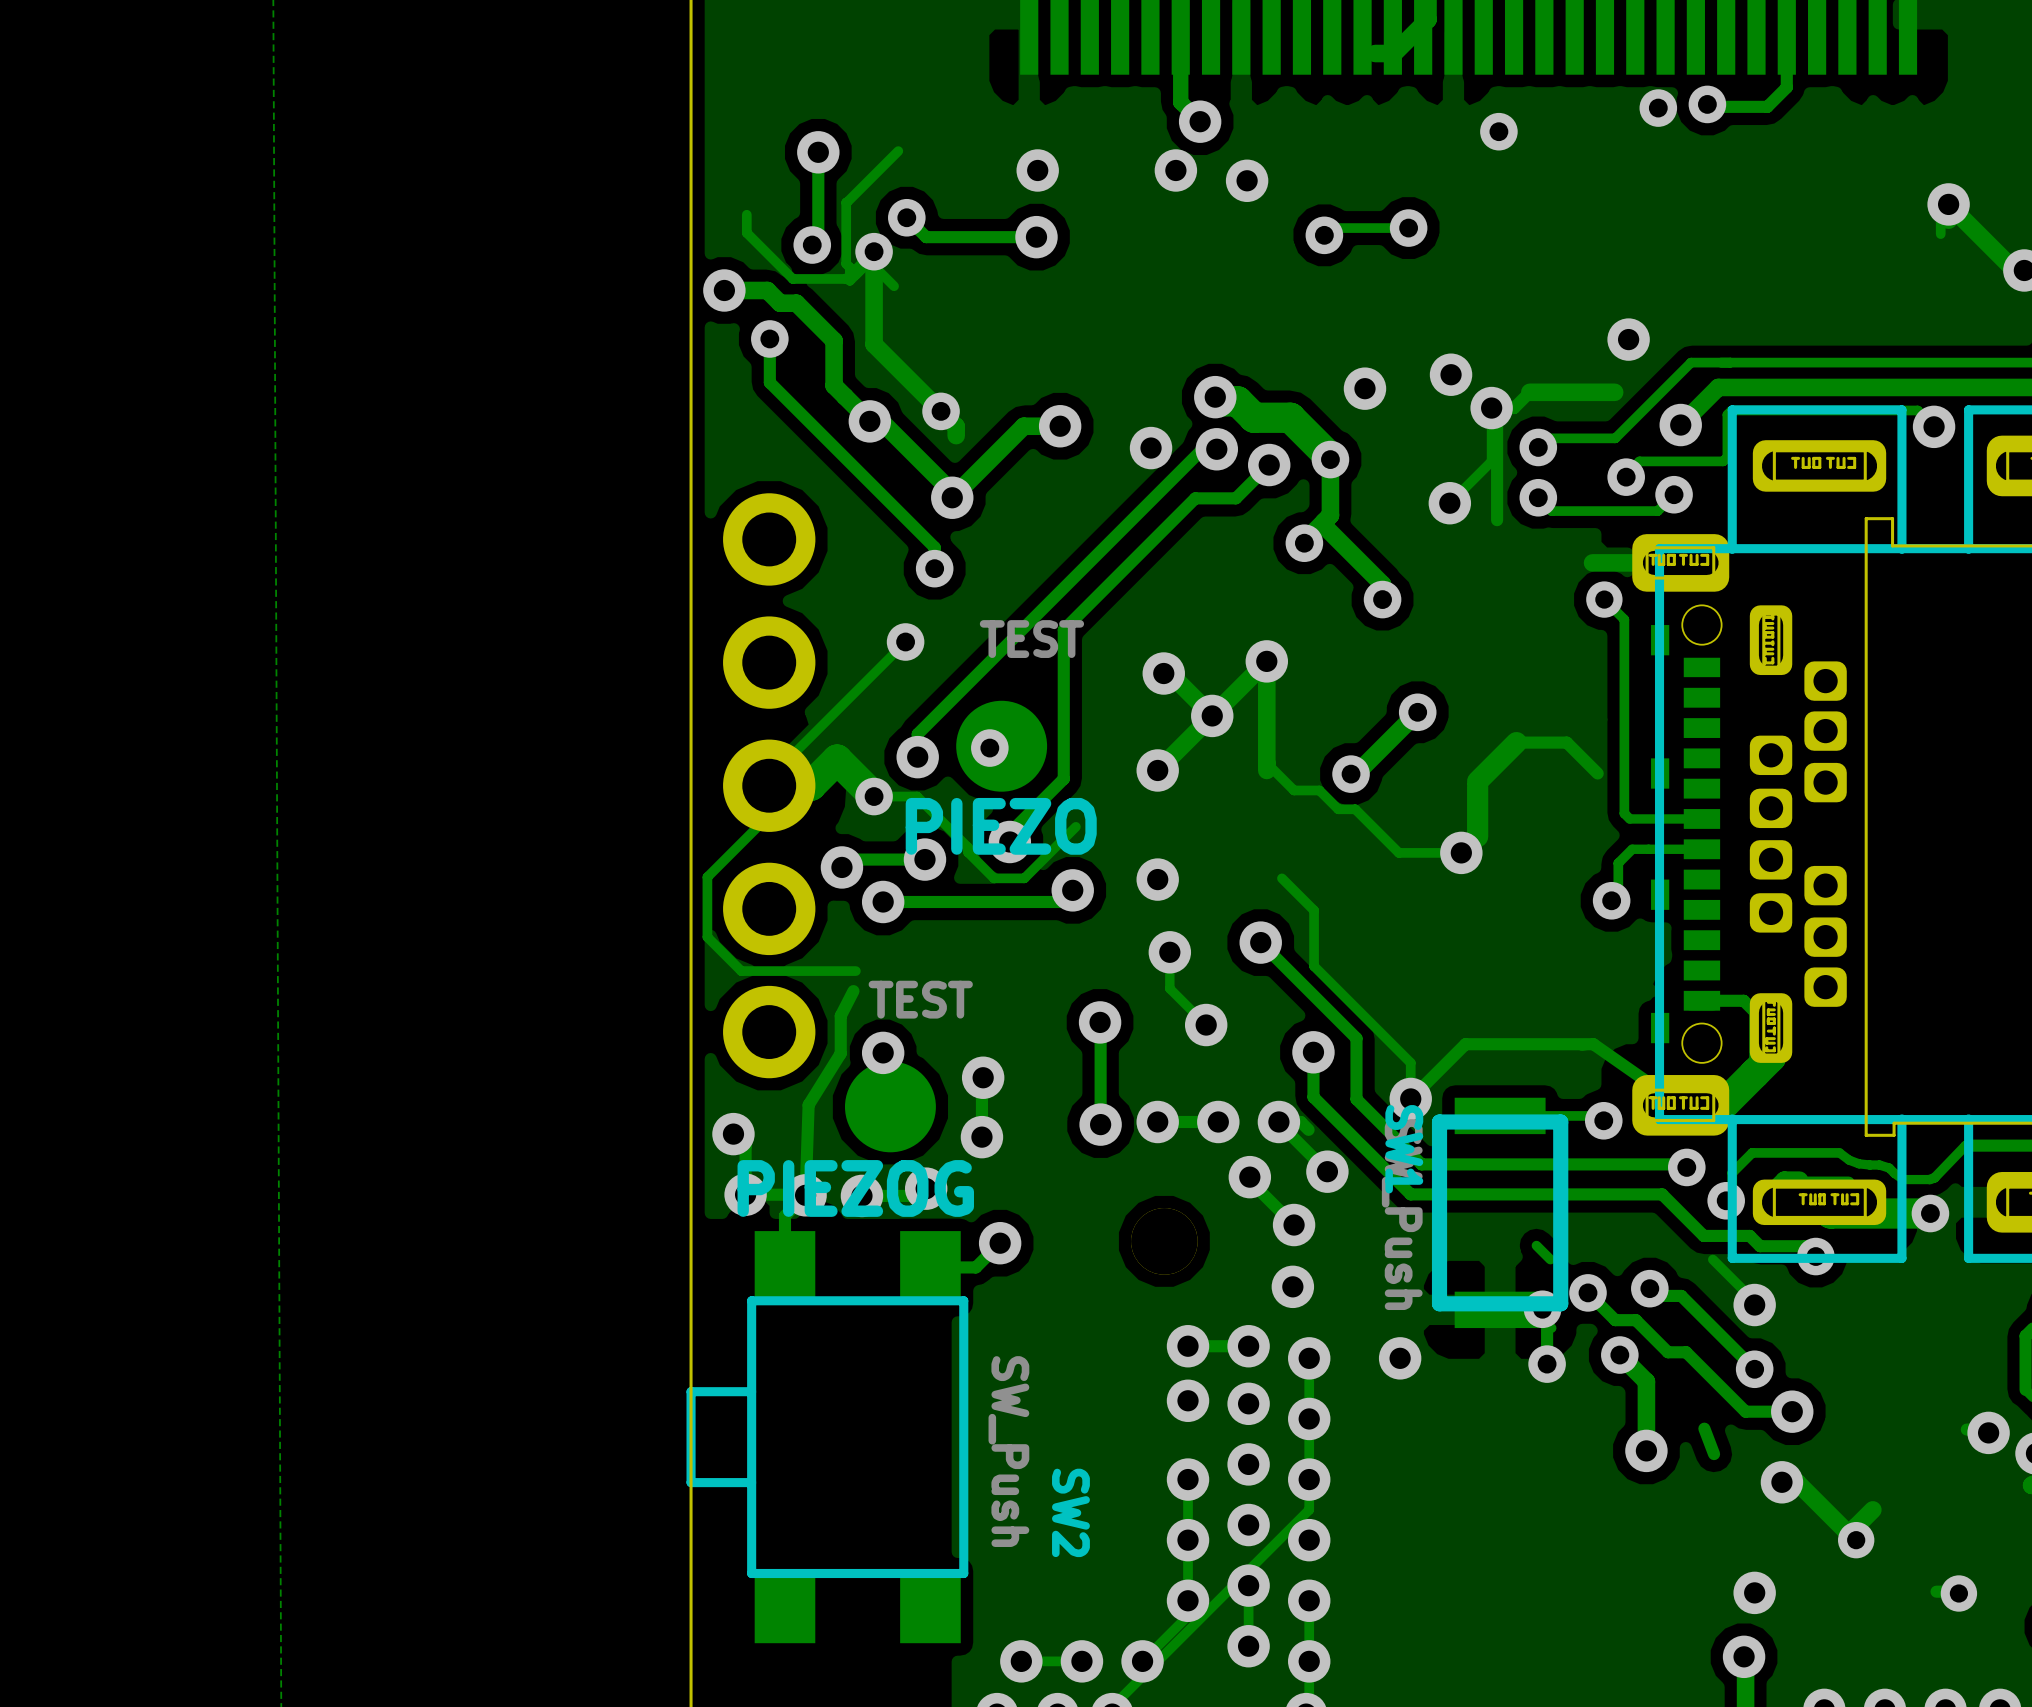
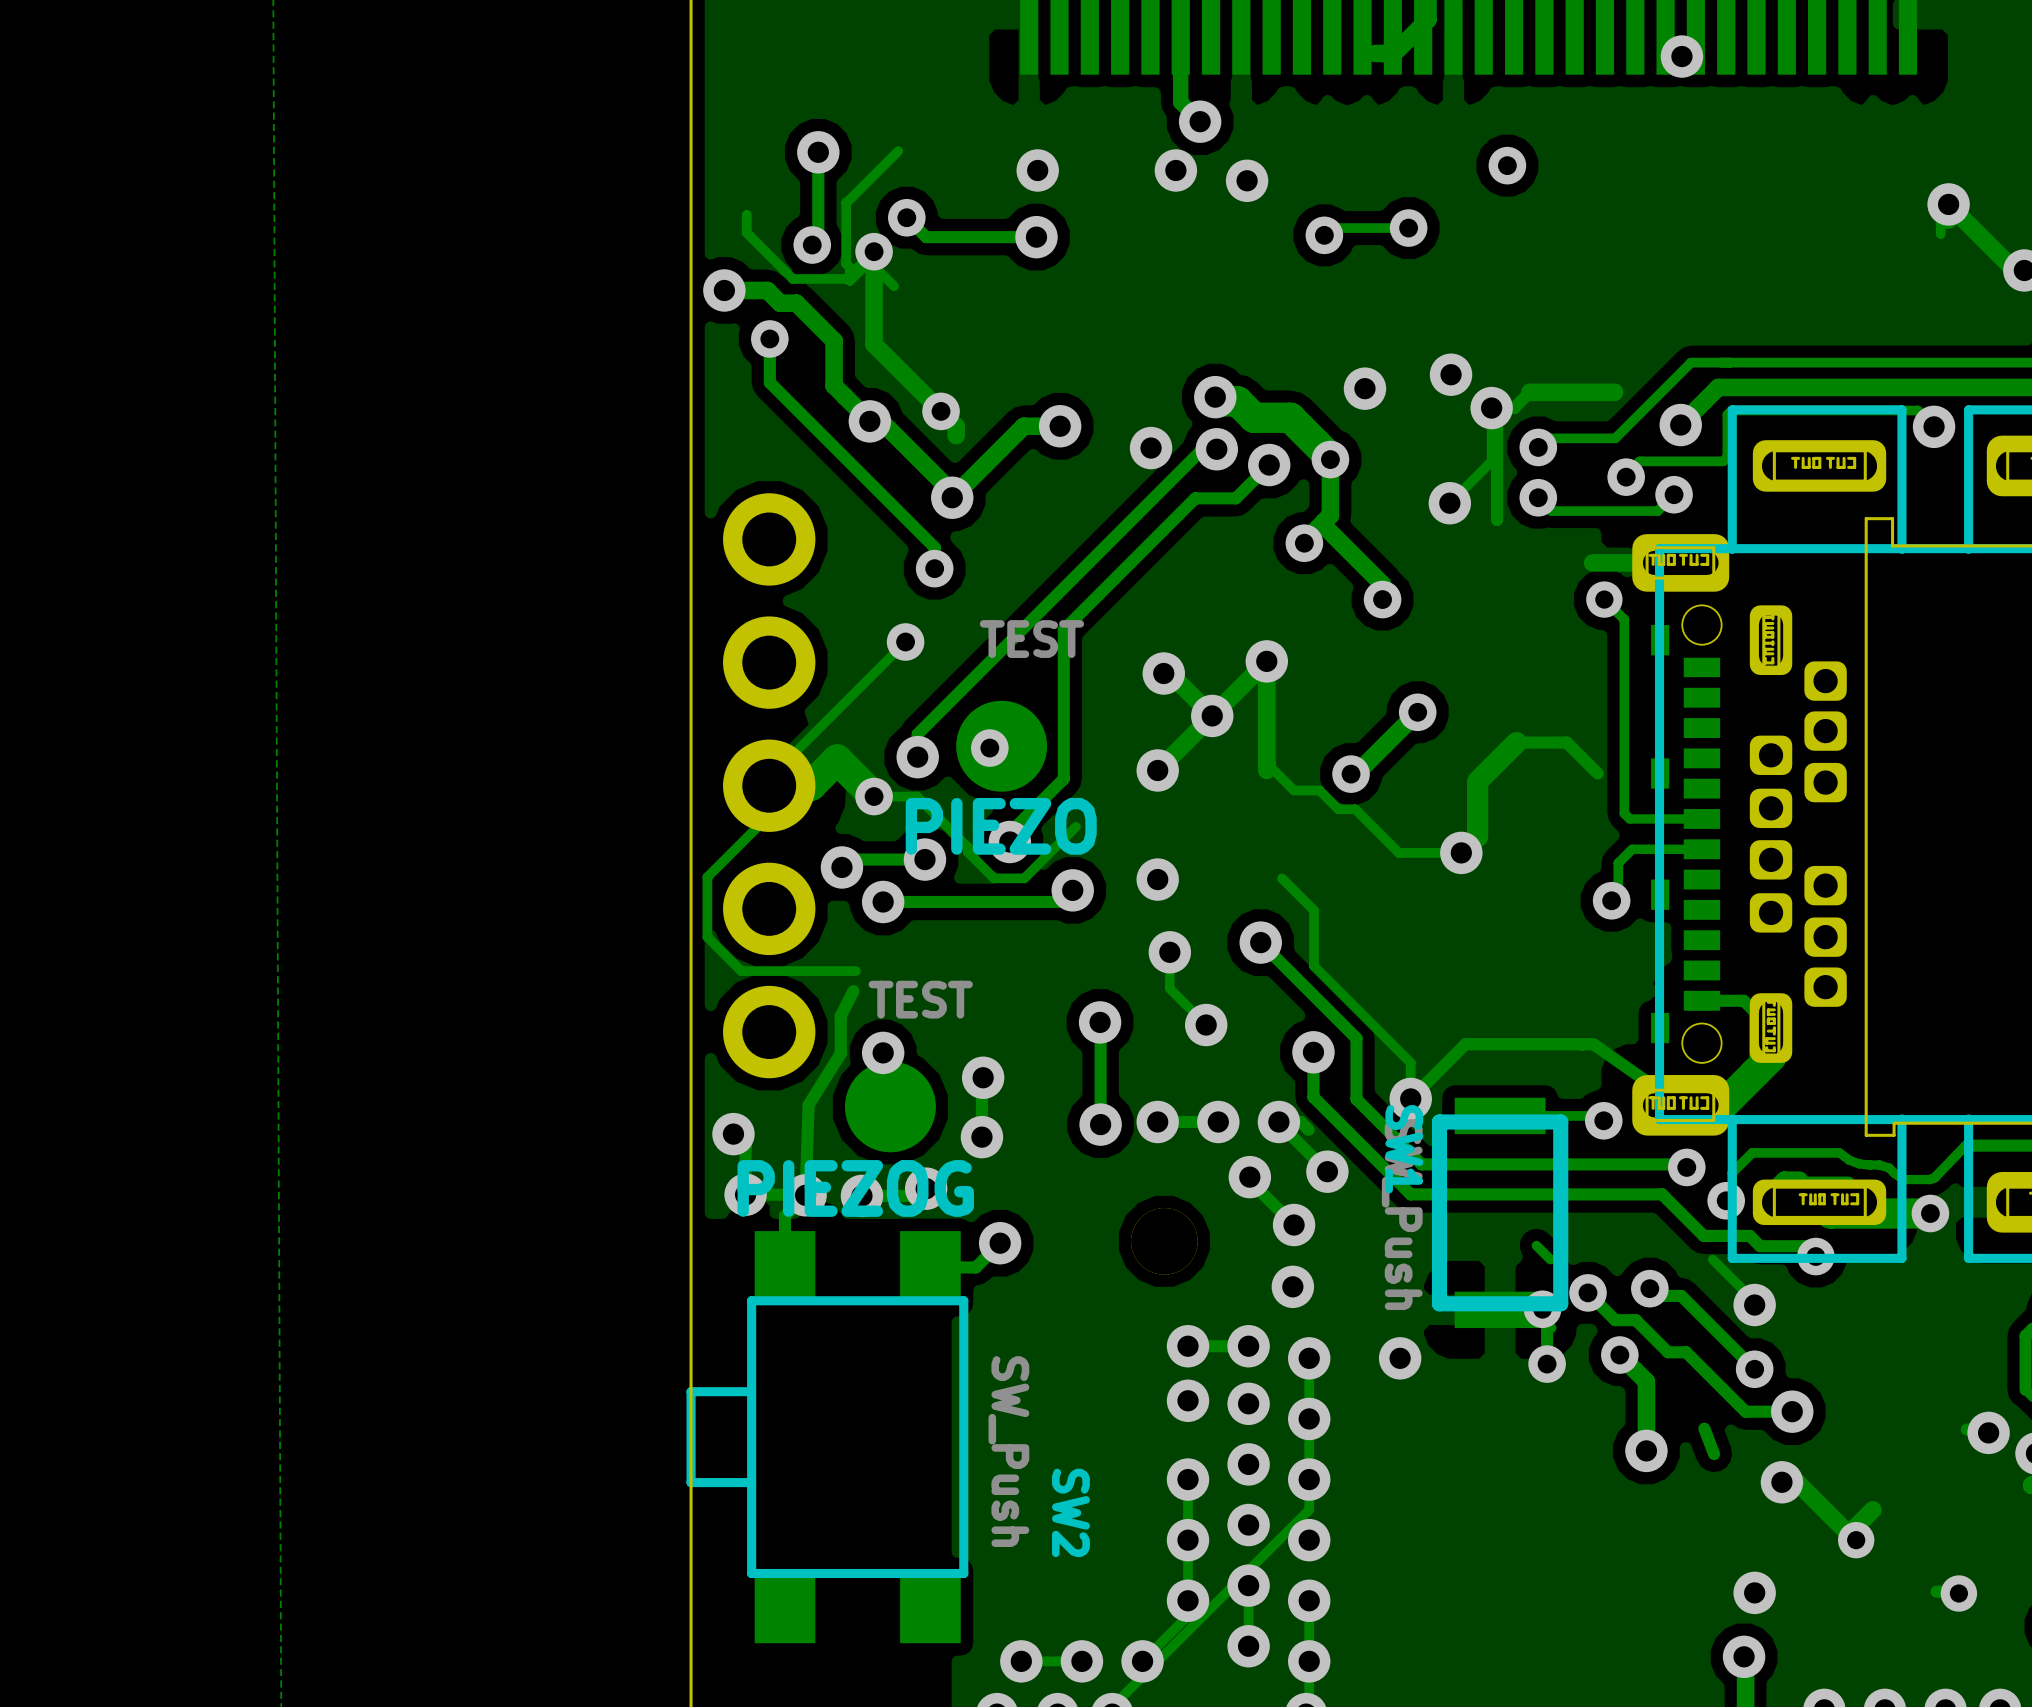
track: (1786, 14) (1786, 87) (1767, 106) (1709, 106) (1707, 104) -> none
via: (1707, 104) -> none
via: (1658, 108) -> none
via position: (1498, 131) -> (1507, 165)
via position: (1628, 339) -> (1681, 56)

